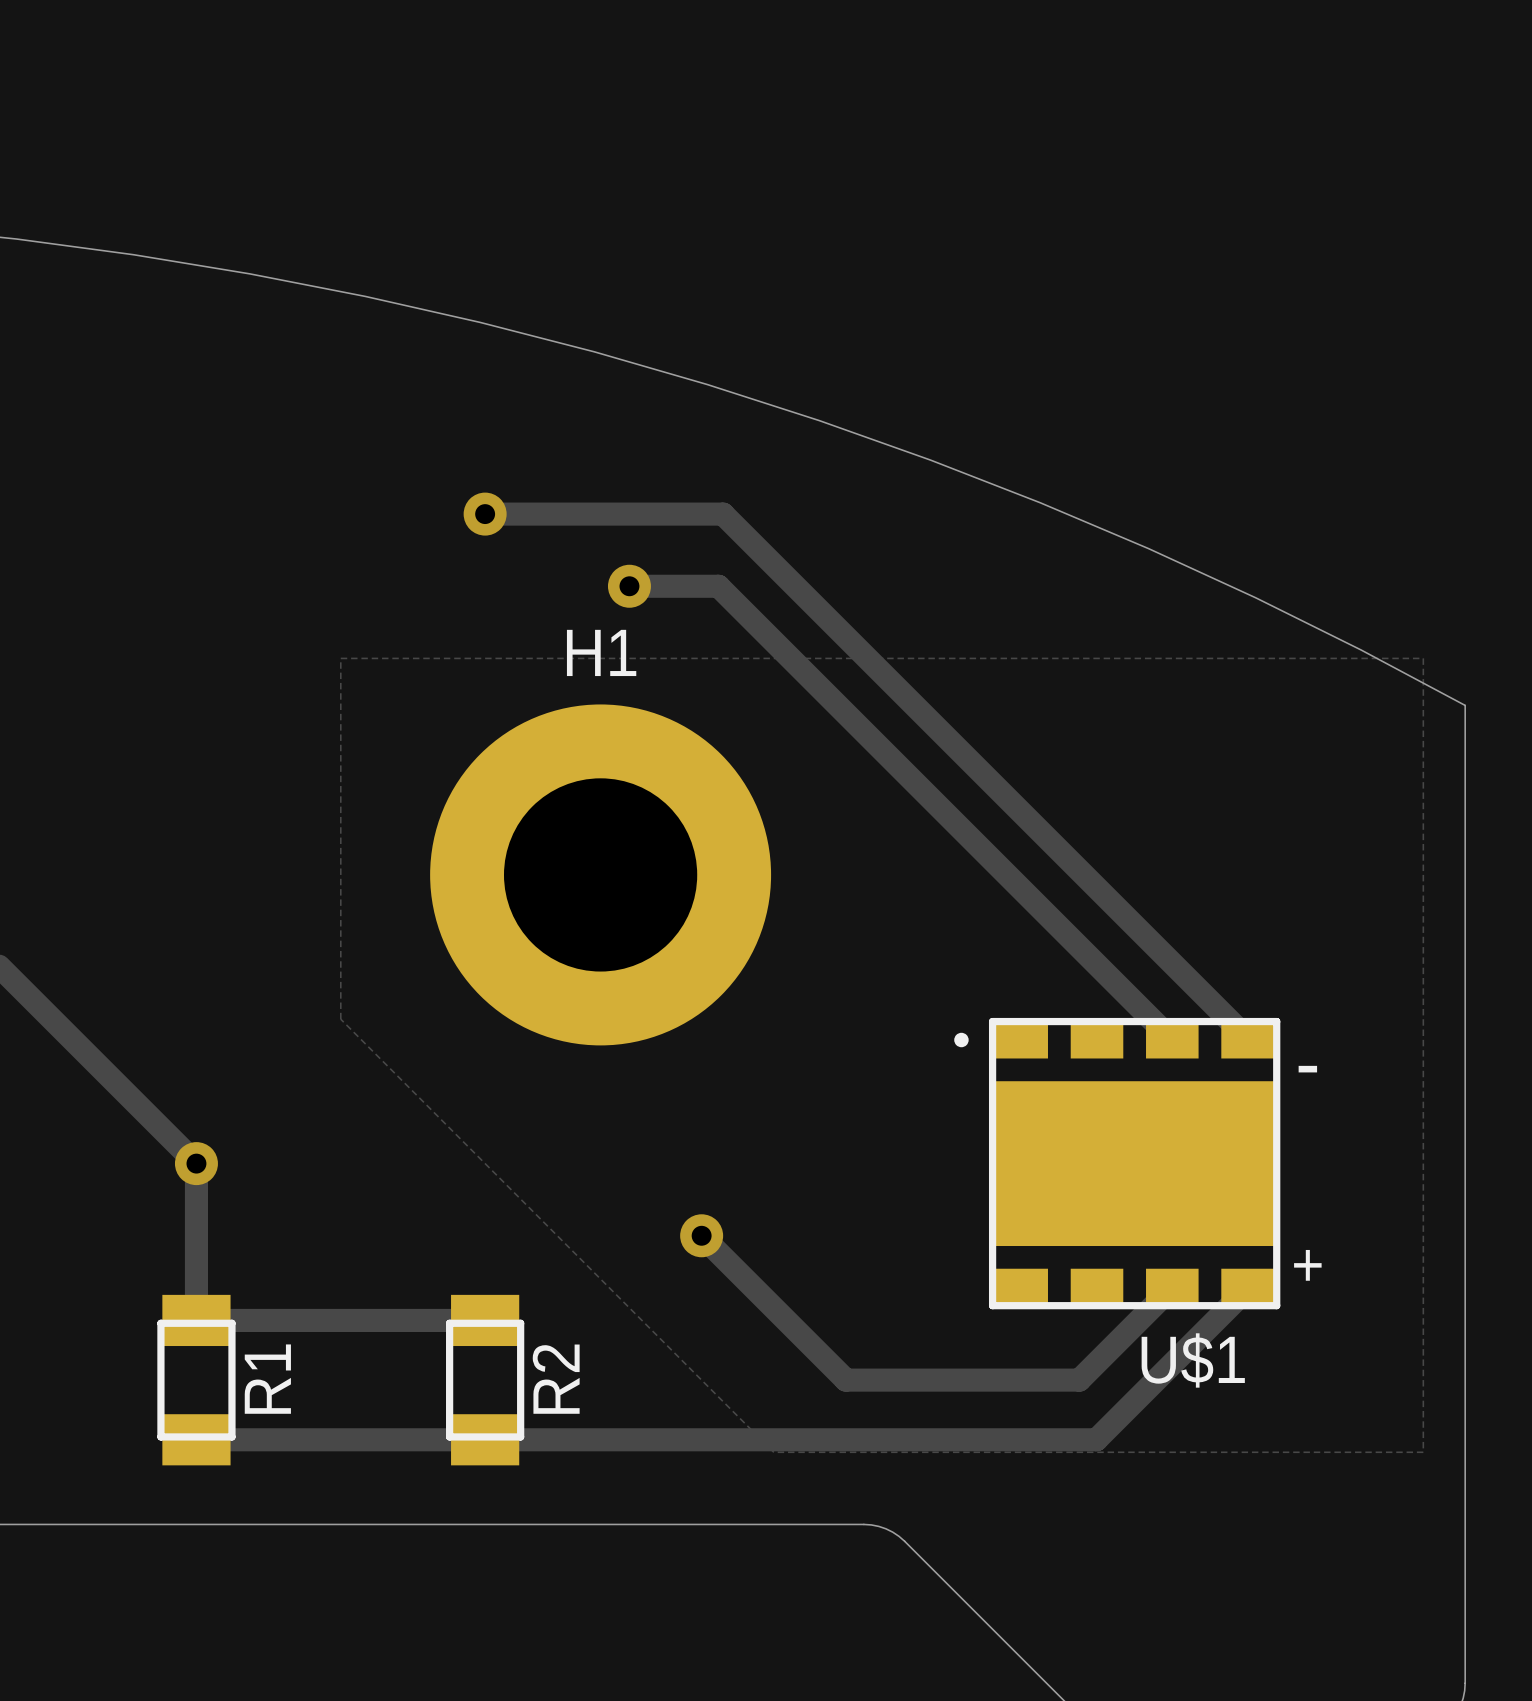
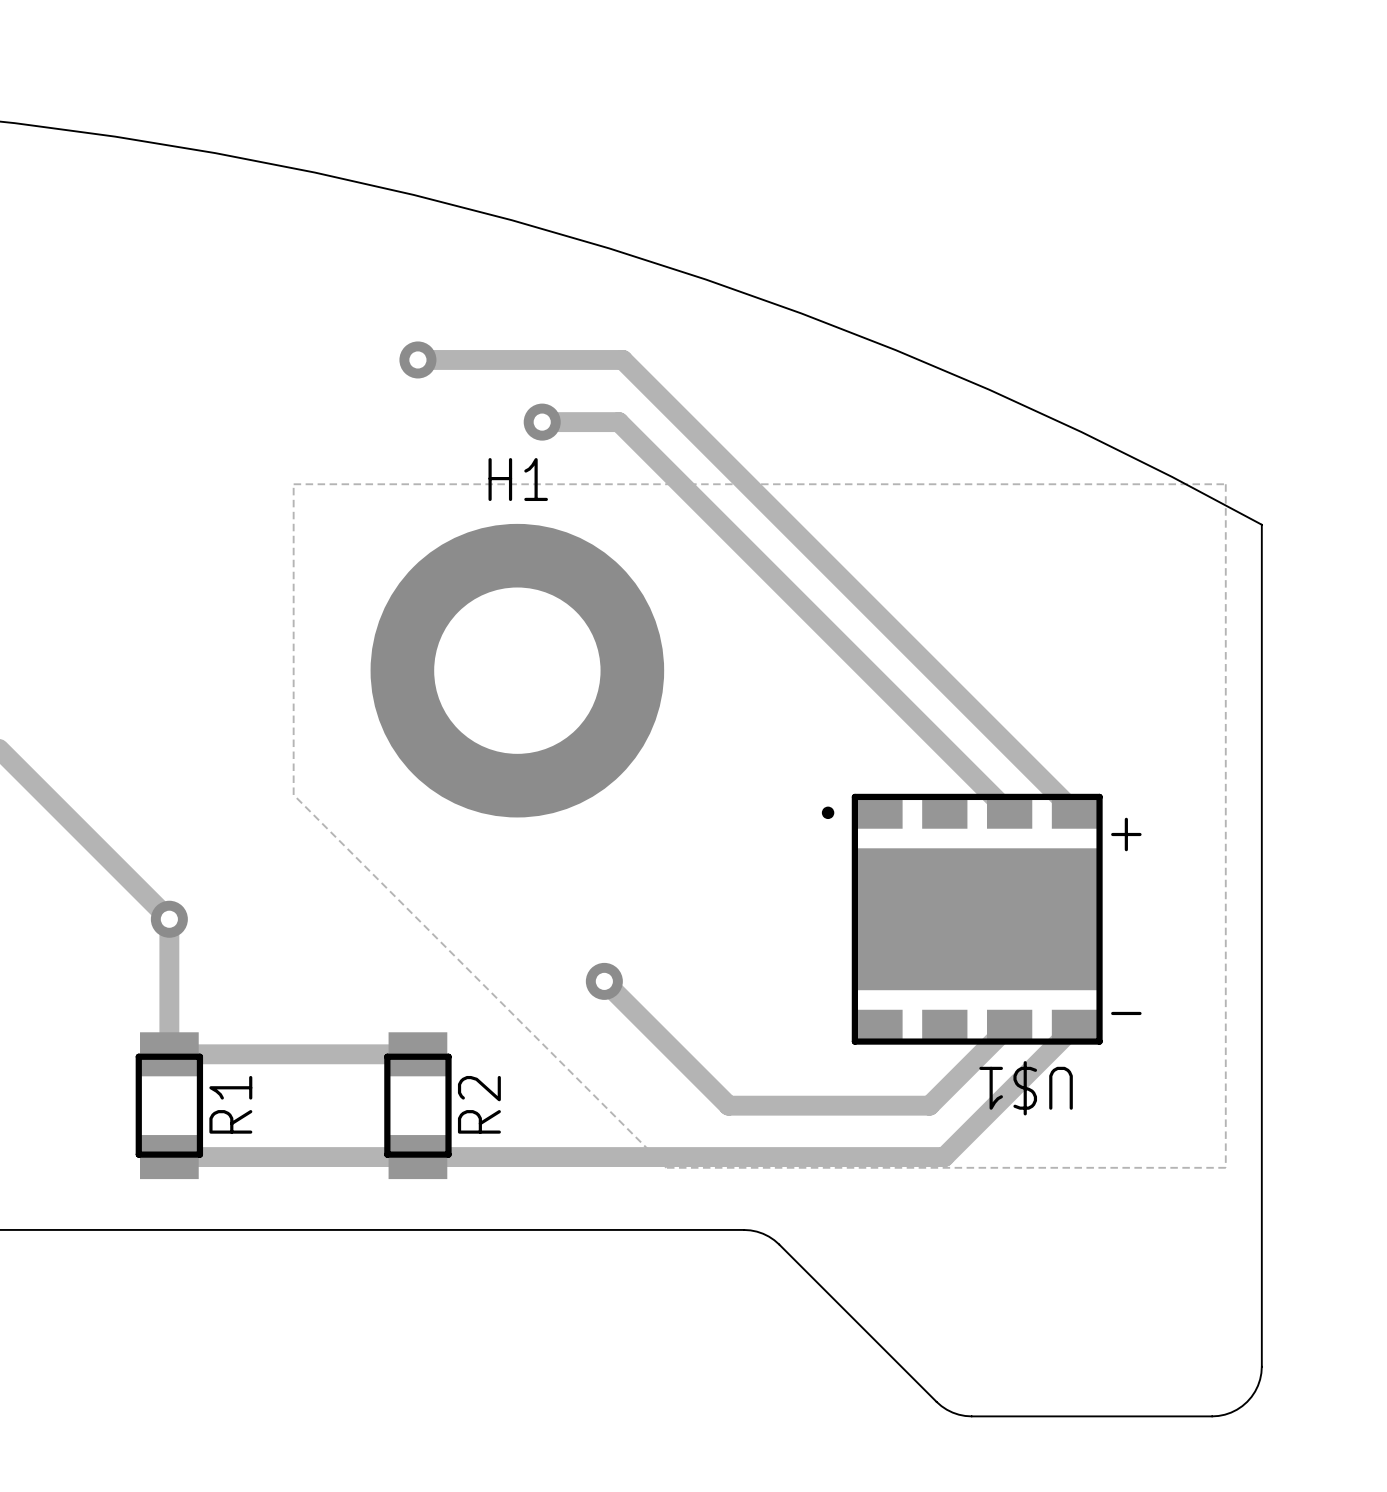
U$1 text position: - (1307, 1069) -> - (1126, 1013)
U$1 text position: + (1307, 1265) -> + (1126, 834)
U$1 name rotation: 0° (1193, 1360) -> 180° (1026, 1088)

